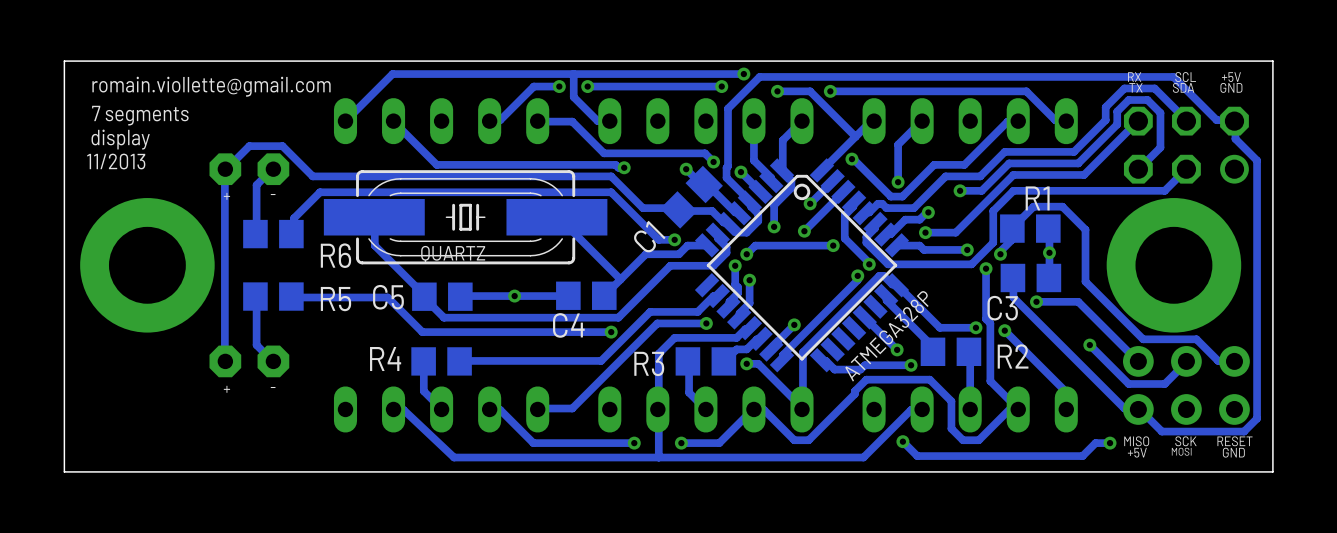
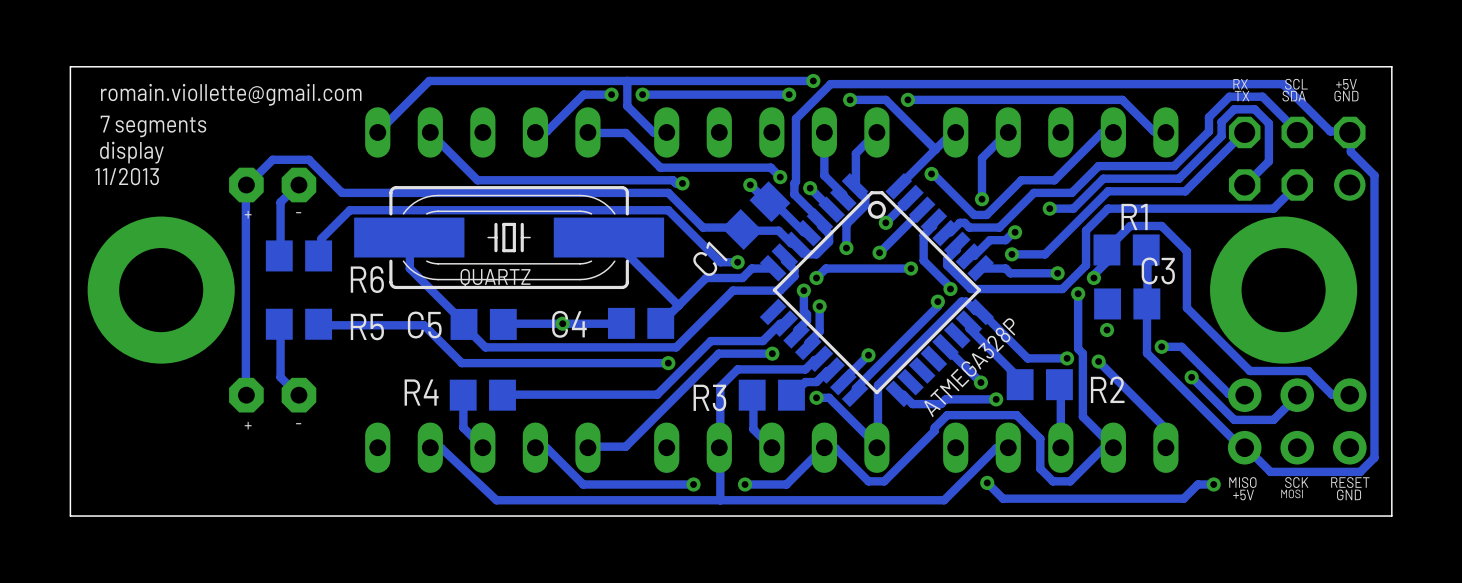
via: (1049, 252) -> none
track: (1012, 277) (1013, 297) (1124, 408) (1138, 409) -> (1146, 303) (1146, 353) (1240, 446) (1244, 447)
via: none -> (1107, 330)
track: (1036, 301) (1078, 301) (1137, 360) -> none
via: (1036, 301) -> none
C3 name position: C3 (1002, 308) -> C3 (1158, 270)
track: none -> (1161, 346) (1181, 346) (1228, 394) (1244, 395)
via: none -> (1161, 346)
C4 name position: C4 (568, 325) -> C4 (569, 324)

